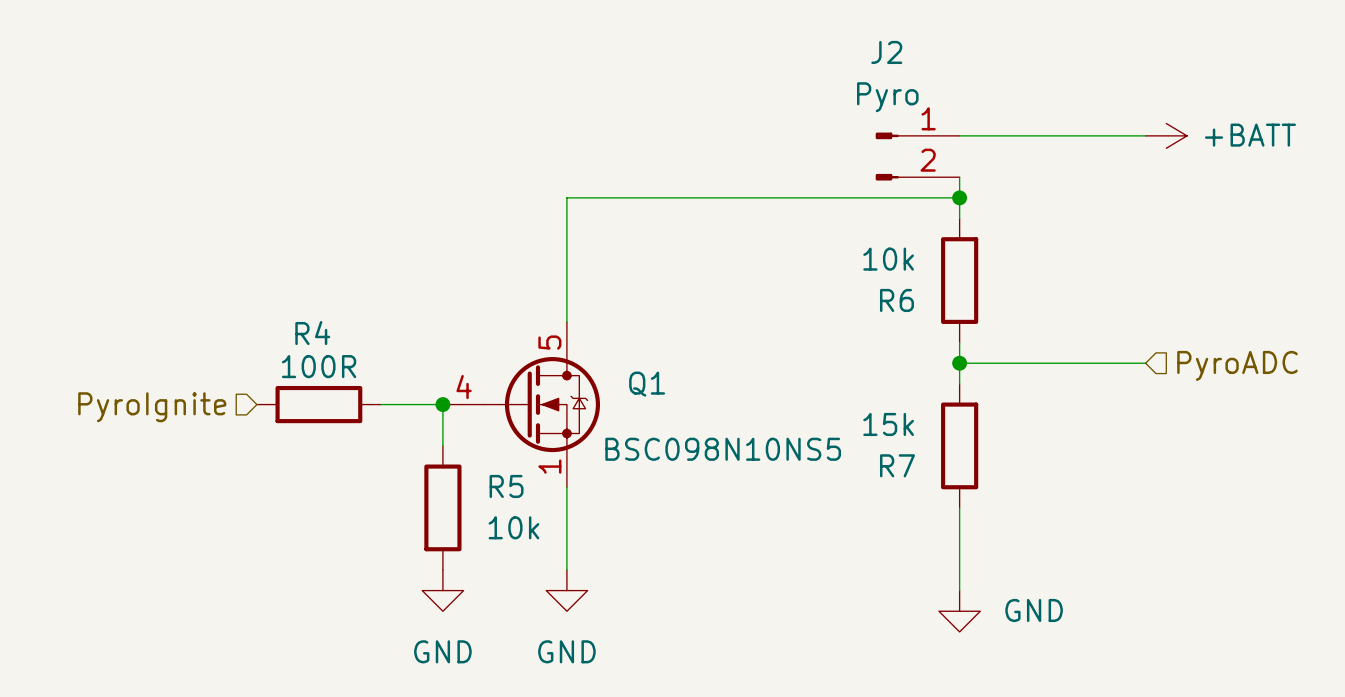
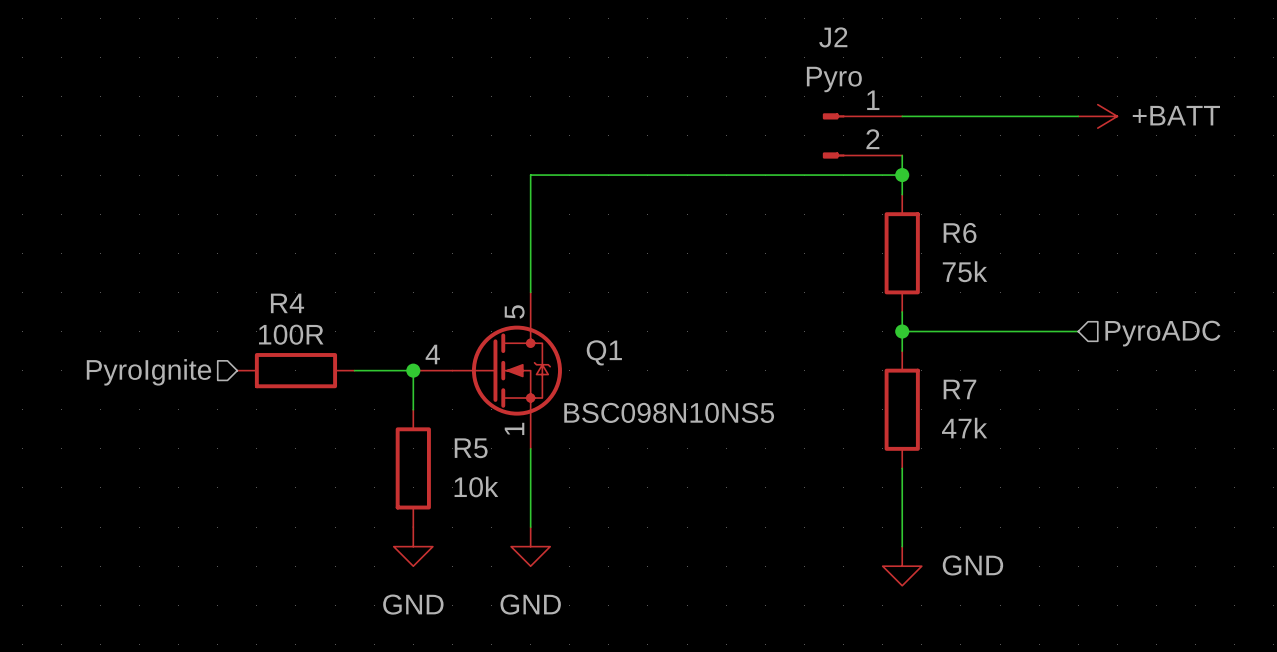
R6 value: 10k (888, 259) -> 75k (965, 271)
R6 name position: R6 (896, 300) -> R6 (960, 232)
R7 value: 15k (888, 424) -> 47k (964, 428)
R7 name position: R7 (897, 465) -> R7 (959, 389)

